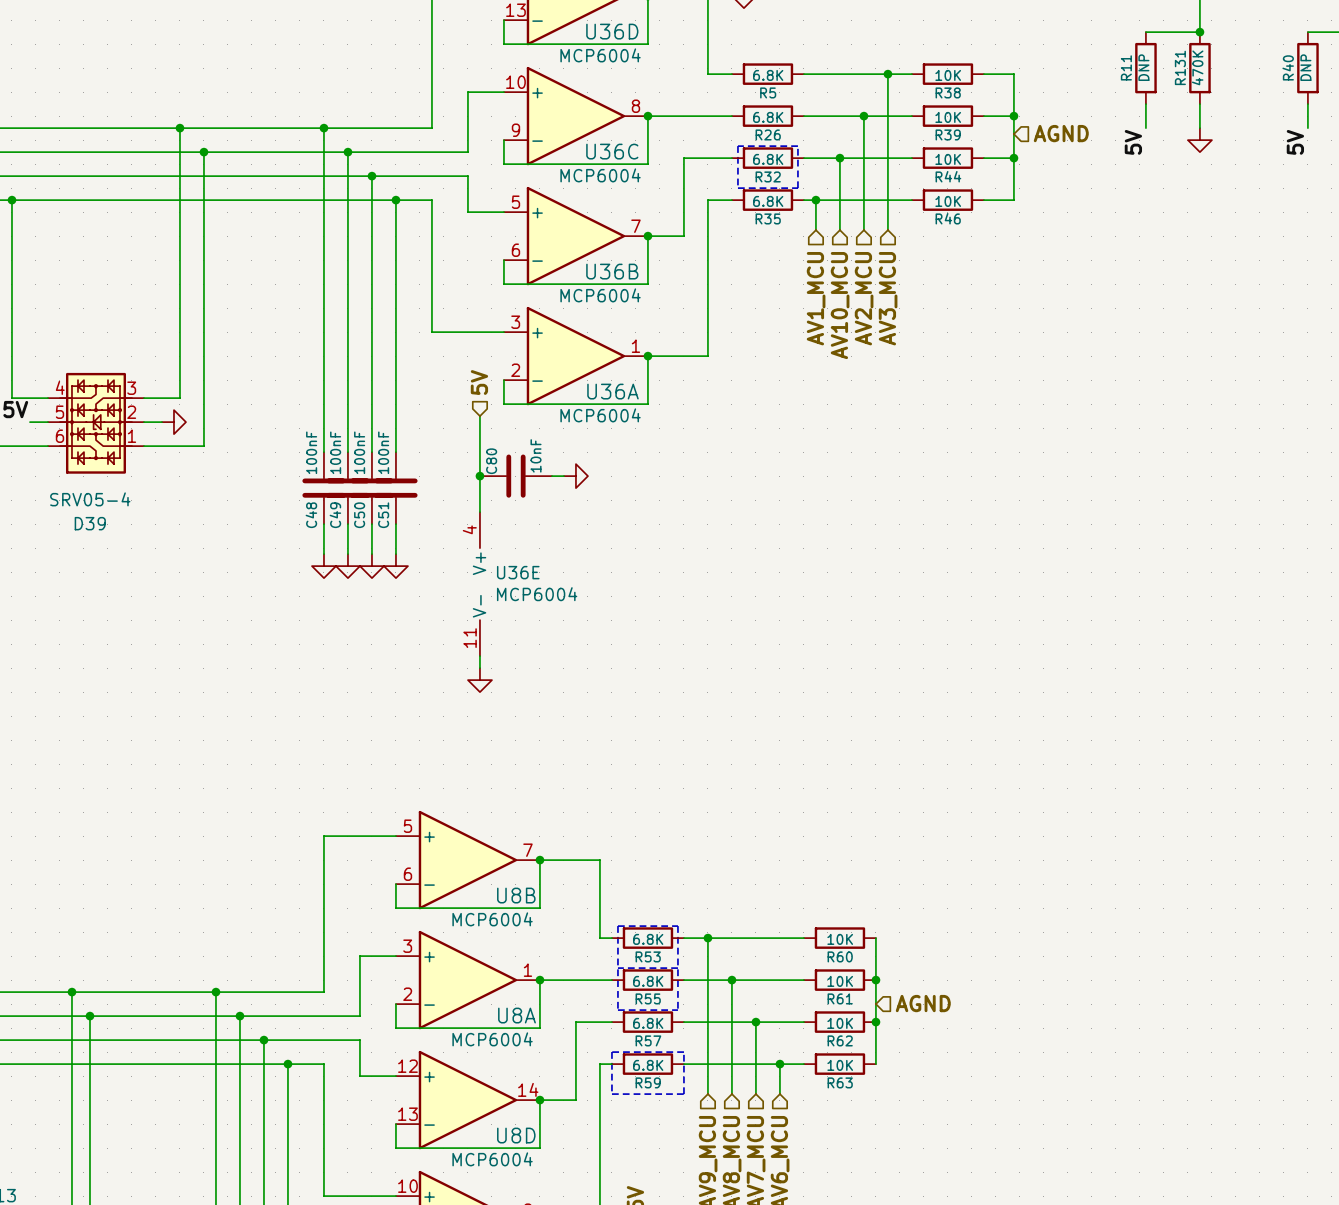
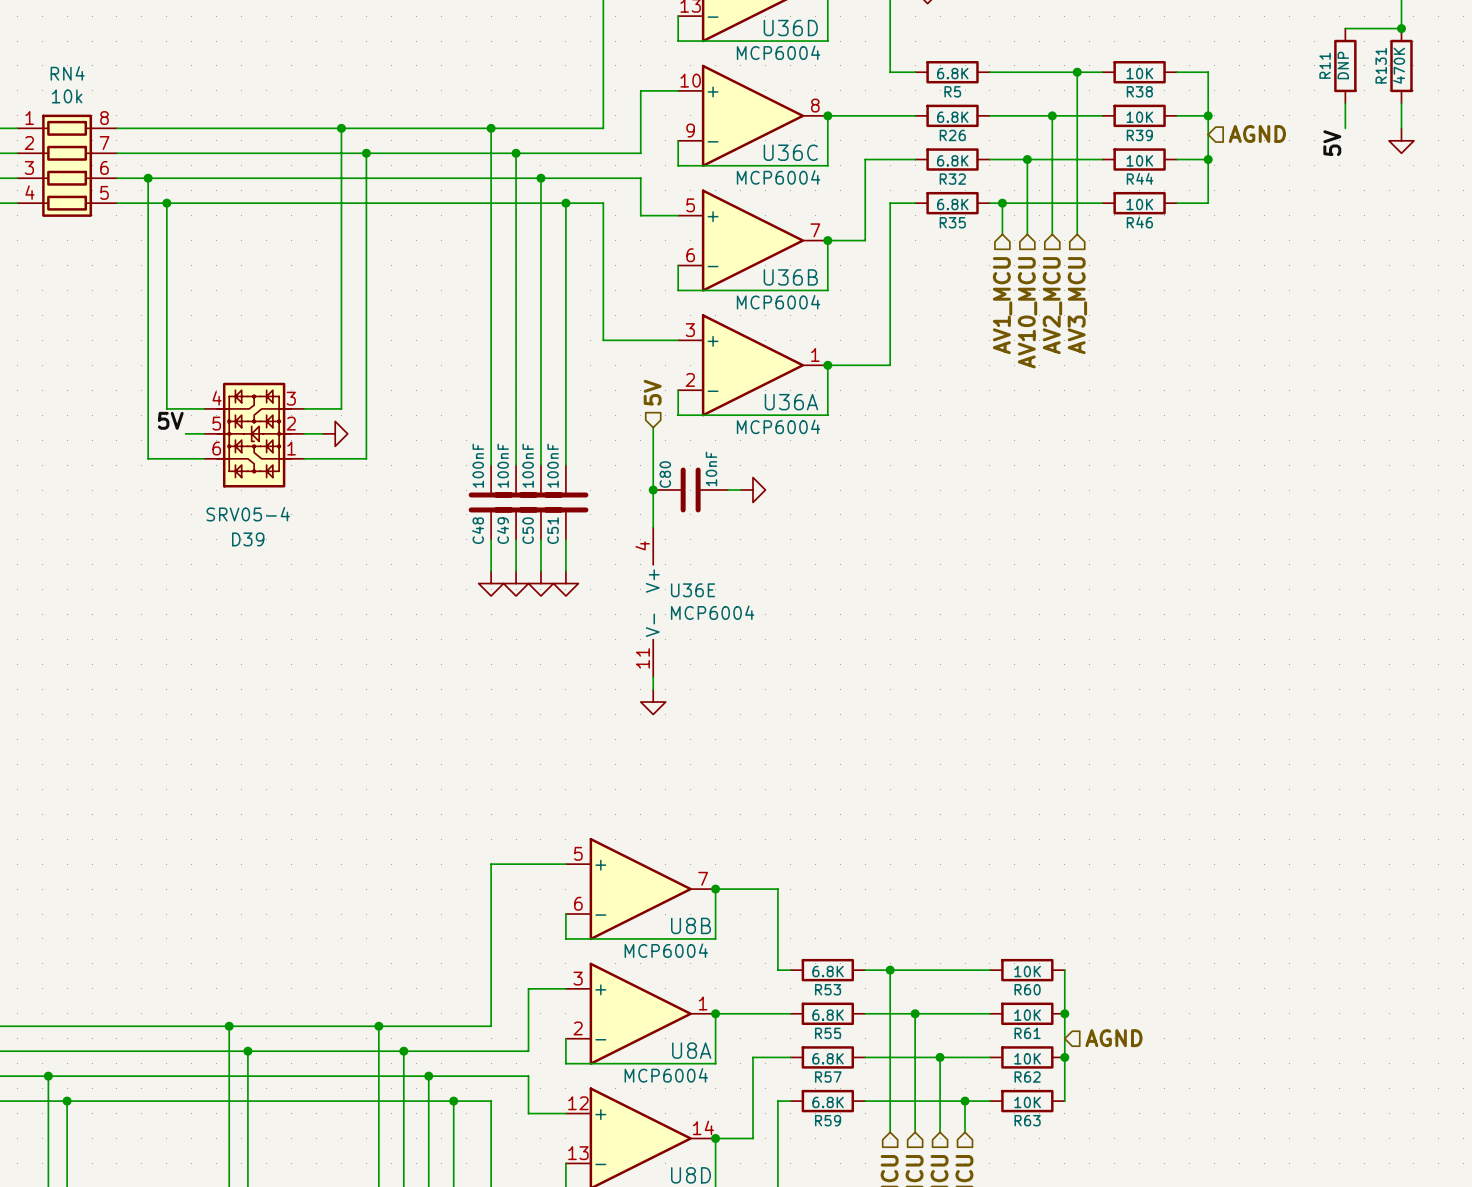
line: (737, 146) (737, 188) (797, 188) (797, 146) (737, 146) -> none
line: (617, 926) (677, 926) (677, 1010) (617, 1010) (617, 926) -> none
line: (617, 968) (677, 968) -> none
line: (611, 1052) (611, 1094) (683, 1094) (683, 1052) (611, 1052) -> none

